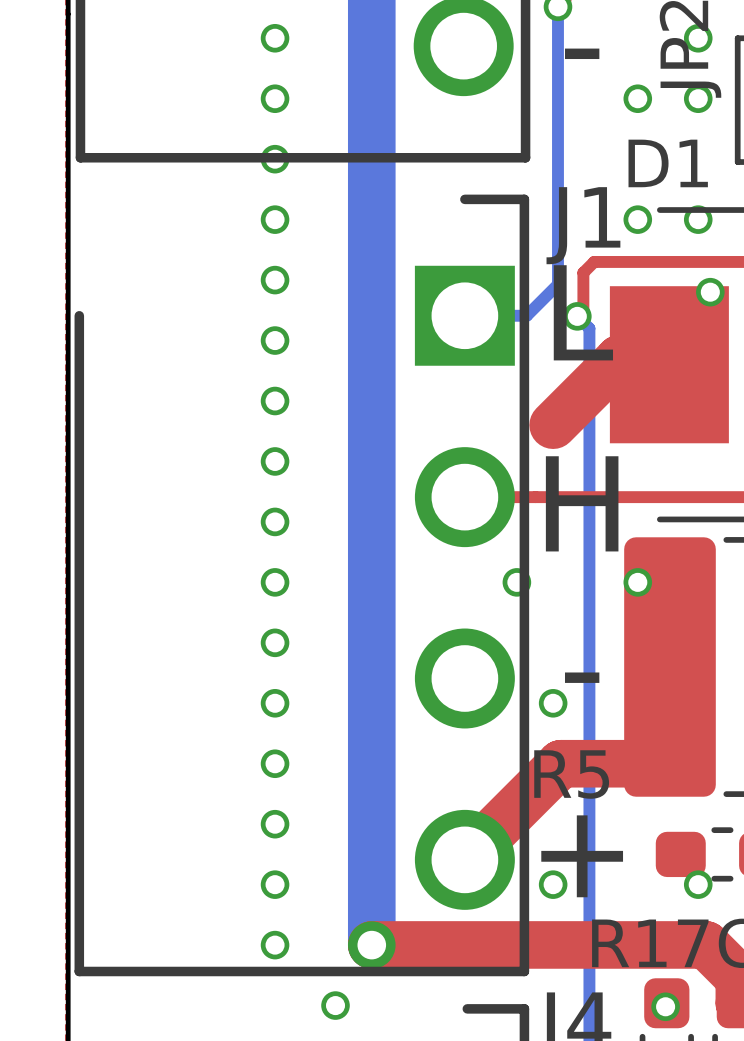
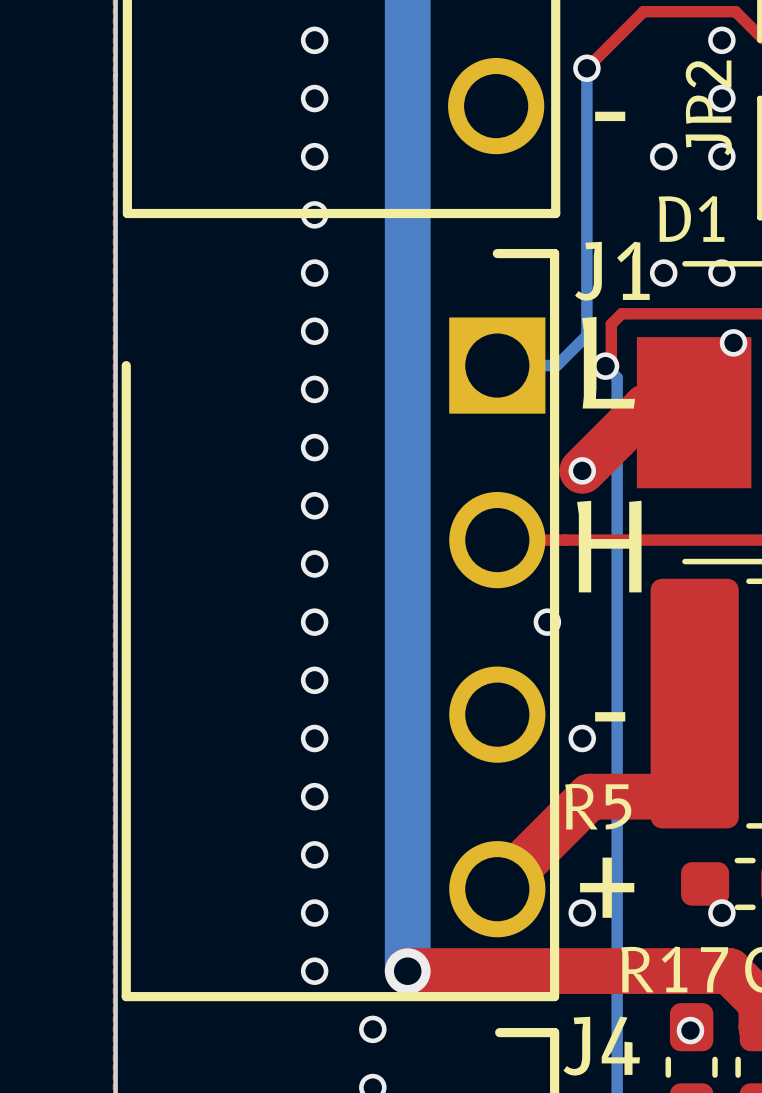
via position: (637, 582) -> (582, 470)

